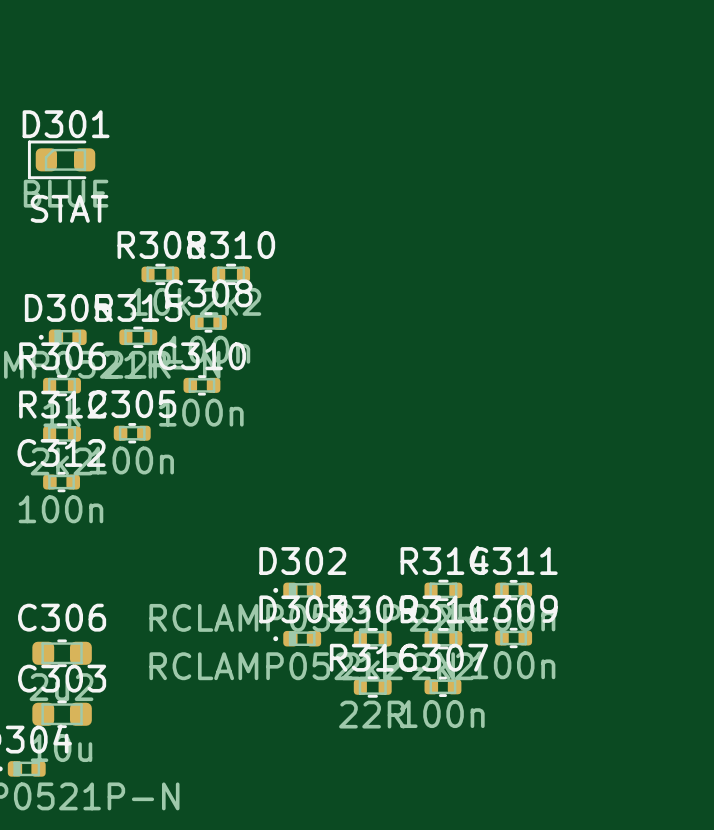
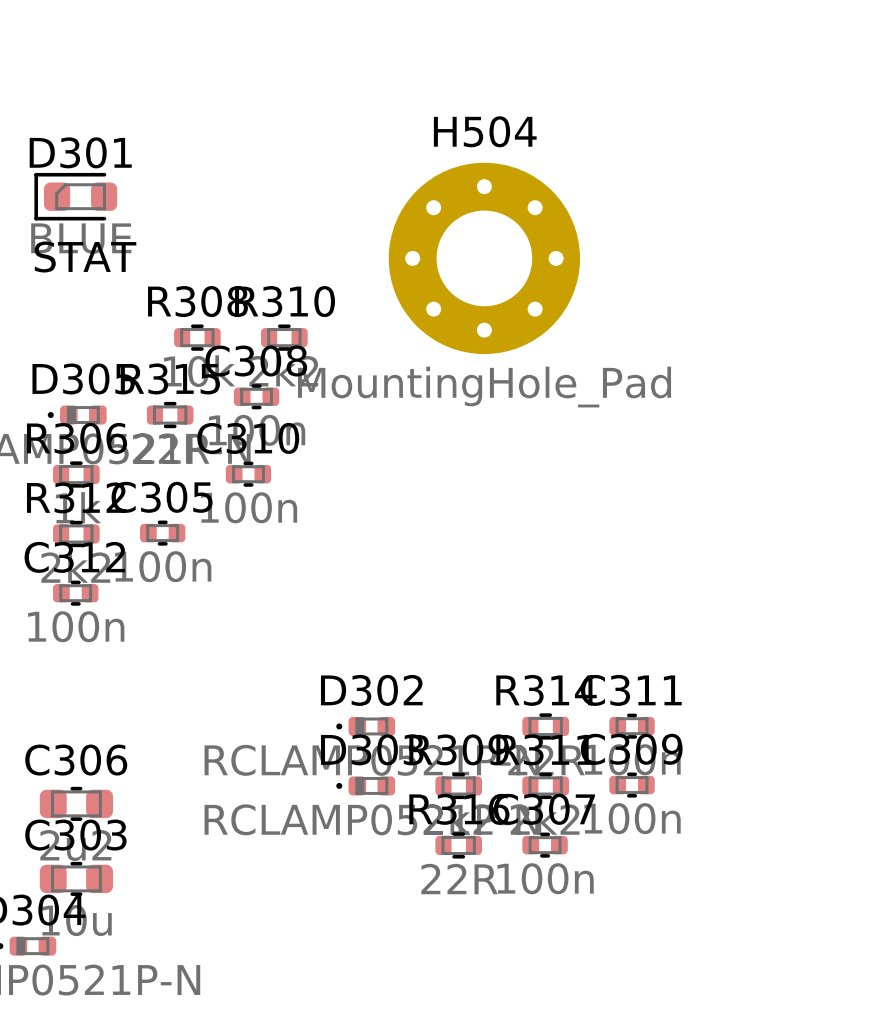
H504: none -> MountingHole_Pad (484, 258)

